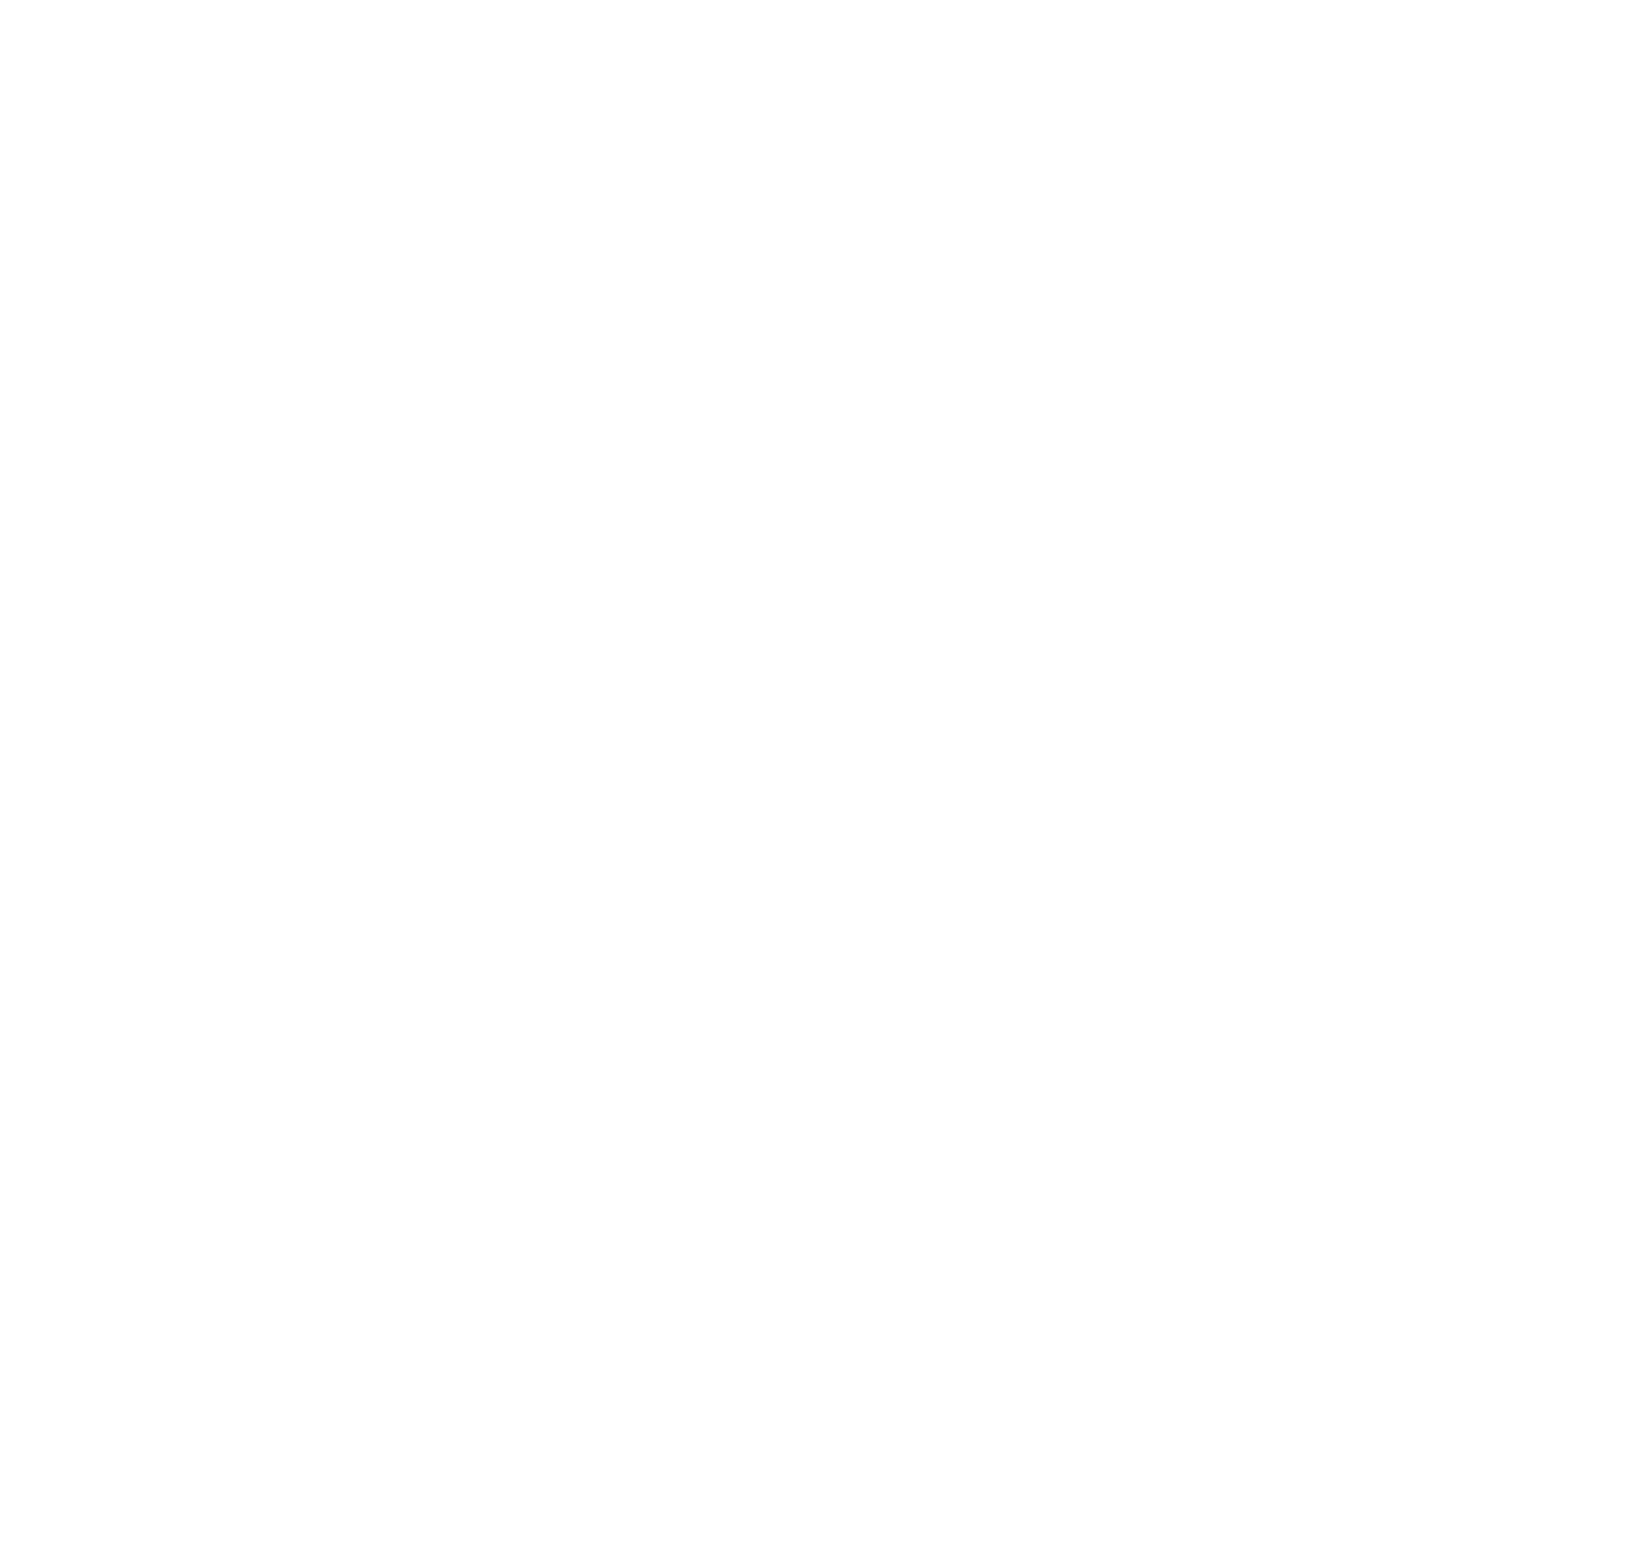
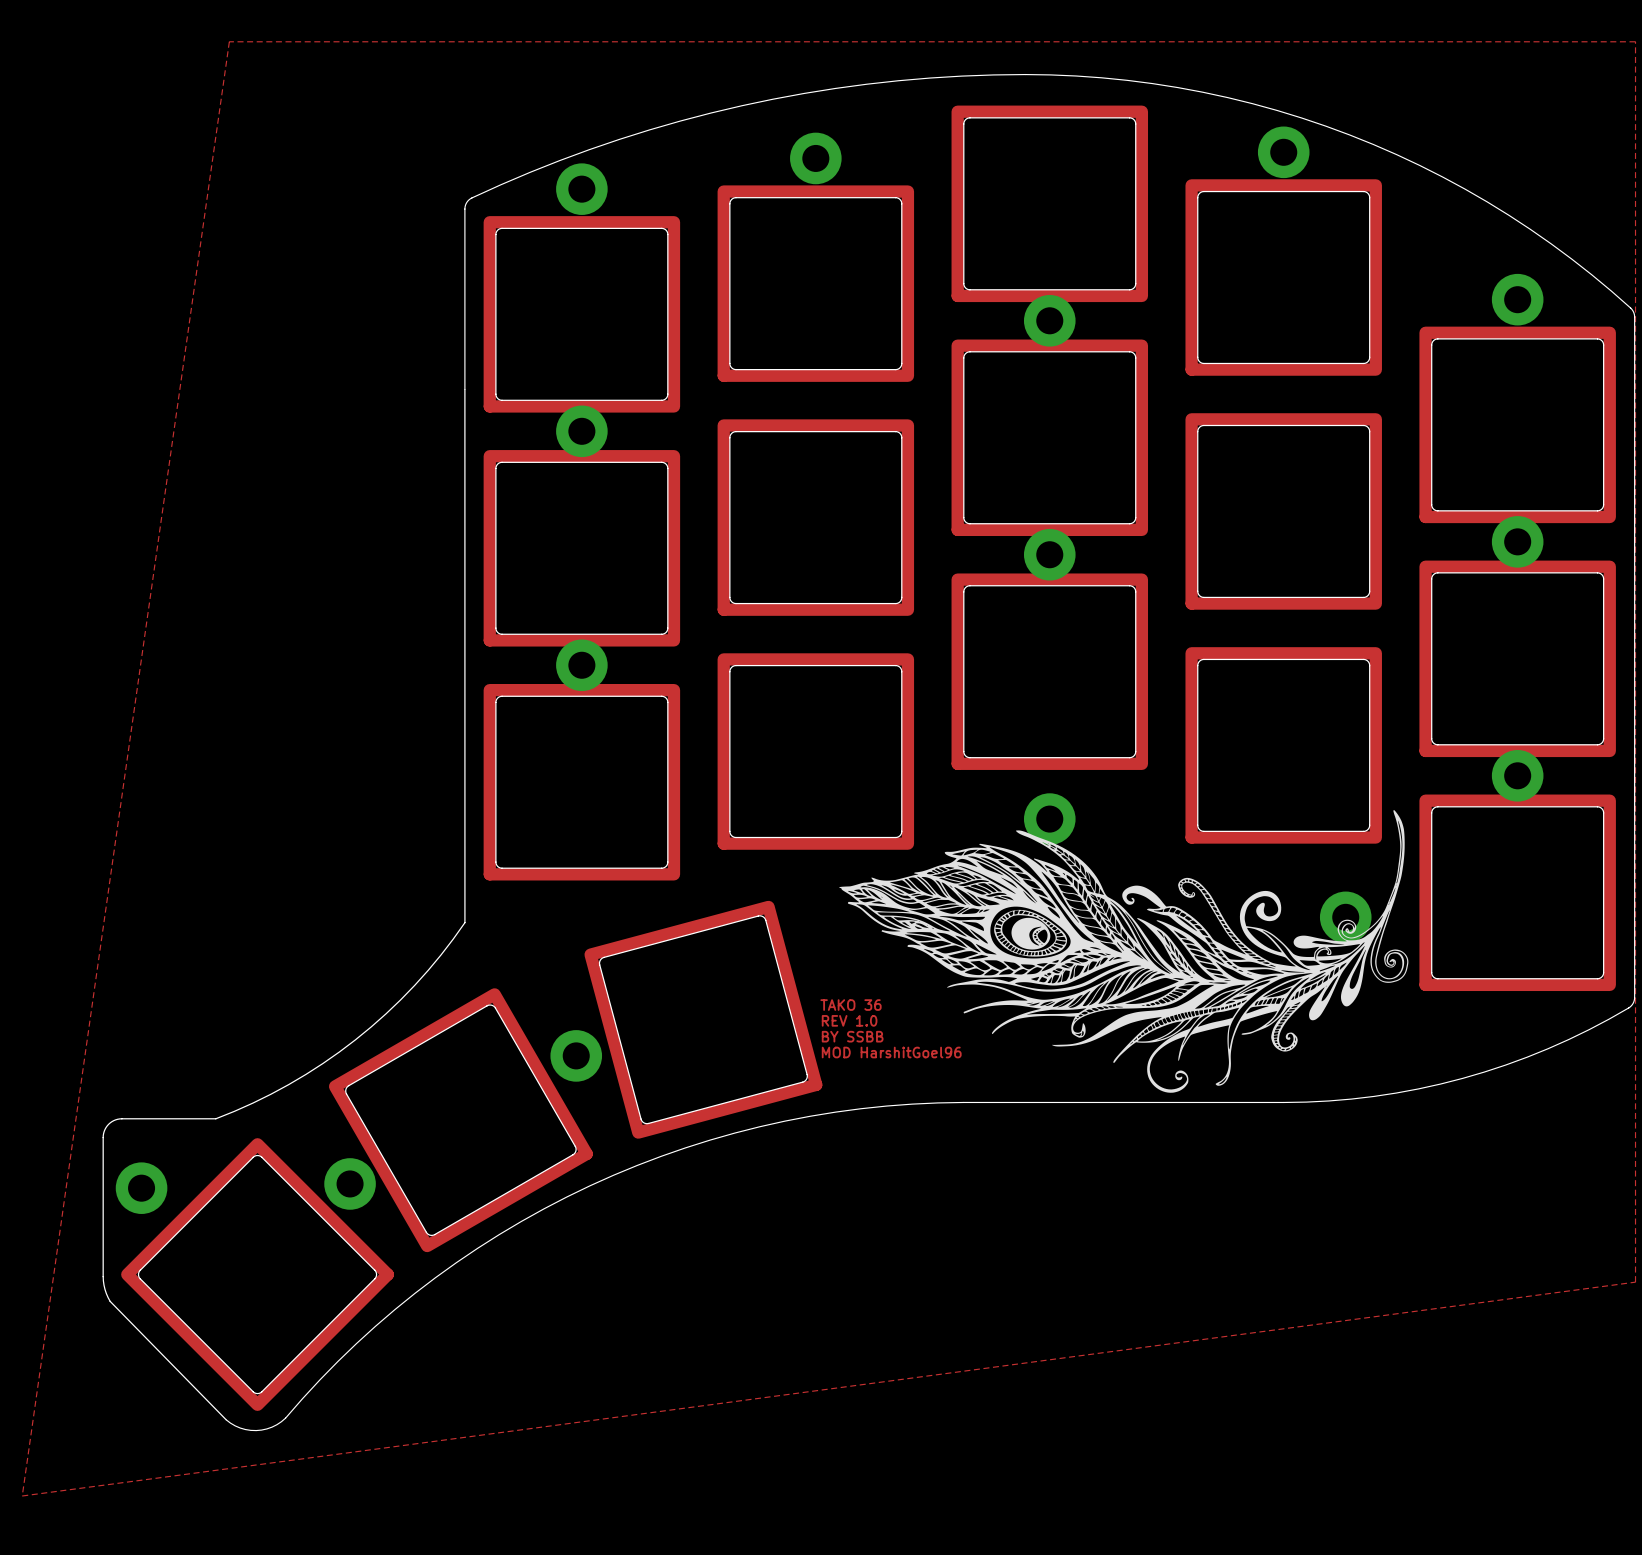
zone outline: none -> (229, 41) (1635, 41) (1635, 1282) (22, 1496) (229, 41)
board edge: none -> (1025, 74) (1101, 77) (1177, 87) (1252, 103) (1349, 134) (1442, 177) (1508, 215) (1571, 259) (1632, 309) (1634, 317) (1634, 997) (1633, 1003) (1609, 1019) (1568, 1039) (1505, 1064) (1440, 1084) (1373, 1096) (1328, 1100) (1283, 1102) (912, 1104) (810, 1116) (710, 1140) (613, 1175) (521, 1221) (456, 1262) (394, 1309) (337, 1361) (281, 1421) (266, 1428) (256, 1430) (245, 1429) (230, 1423) (108, 1297) (103, 1276) (103, 1133) (108, 1124) (119, 1118) (215, 1118) (252, 1103) (288, 1084) (339, 1051) (386, 1013) (428, 970) (464, 922) (464, 209) (466, 202) (471, 197) (500, 184) (589, 149) (649, 129) (741, 105) (835, 88) (898, 80) (961, 76) (1025, 74)
drawing: none -> [951, 105, 1149, 303]
part: none -> (1283, 152)
part: none -> (815, 158)
drawing: none -> [1185, 179, 1382, 376]
drawing: none -> [717, 185, 915, 382]
part: none -> (581, 189)
drawing: none -> [483, 216, 681, 413]
part: none -> (1517, 299)
part: none -> (1049, 320)
drawing: none -> [1419, 326, 1616, 524]
drawing: none -> [951, 339, 1149, 537]
drawing: none -> [1185, 413, 1382, 610]
drawing: none -> [717, 419, 915, 616]
part: none -> (581, 431)
drawing: none -> [483, 450, 681, 647]
part: none -> (1517, 541)
part: none -> (1049, 554)
drawing: none -> [1419, 560, 1616, 758]
drawing: none -> [951, 573, 1149, 770]
drawing: none -> [717, 647, 1616, 1093]
part: none -> (581, 665)
drawing: none -> [483, 683, 681, 881]
part: none -> (1517, 775)
part: none -> (1049, 819)
drawing: none -> [121, 900, 823, 1411]
part: none -> (1345, 917)
text: none -> TAKO 36 (851, 1005)
text: none -> REV 1.0 (849, 1020)
text: none -> BY SSBB (852, 1036)
text: none -> MOD HarshitGoel96 (891, 1052)
part: none -> (576, 1055)
part: none -> (350, 1183)
part: none -> (141, 1188)

